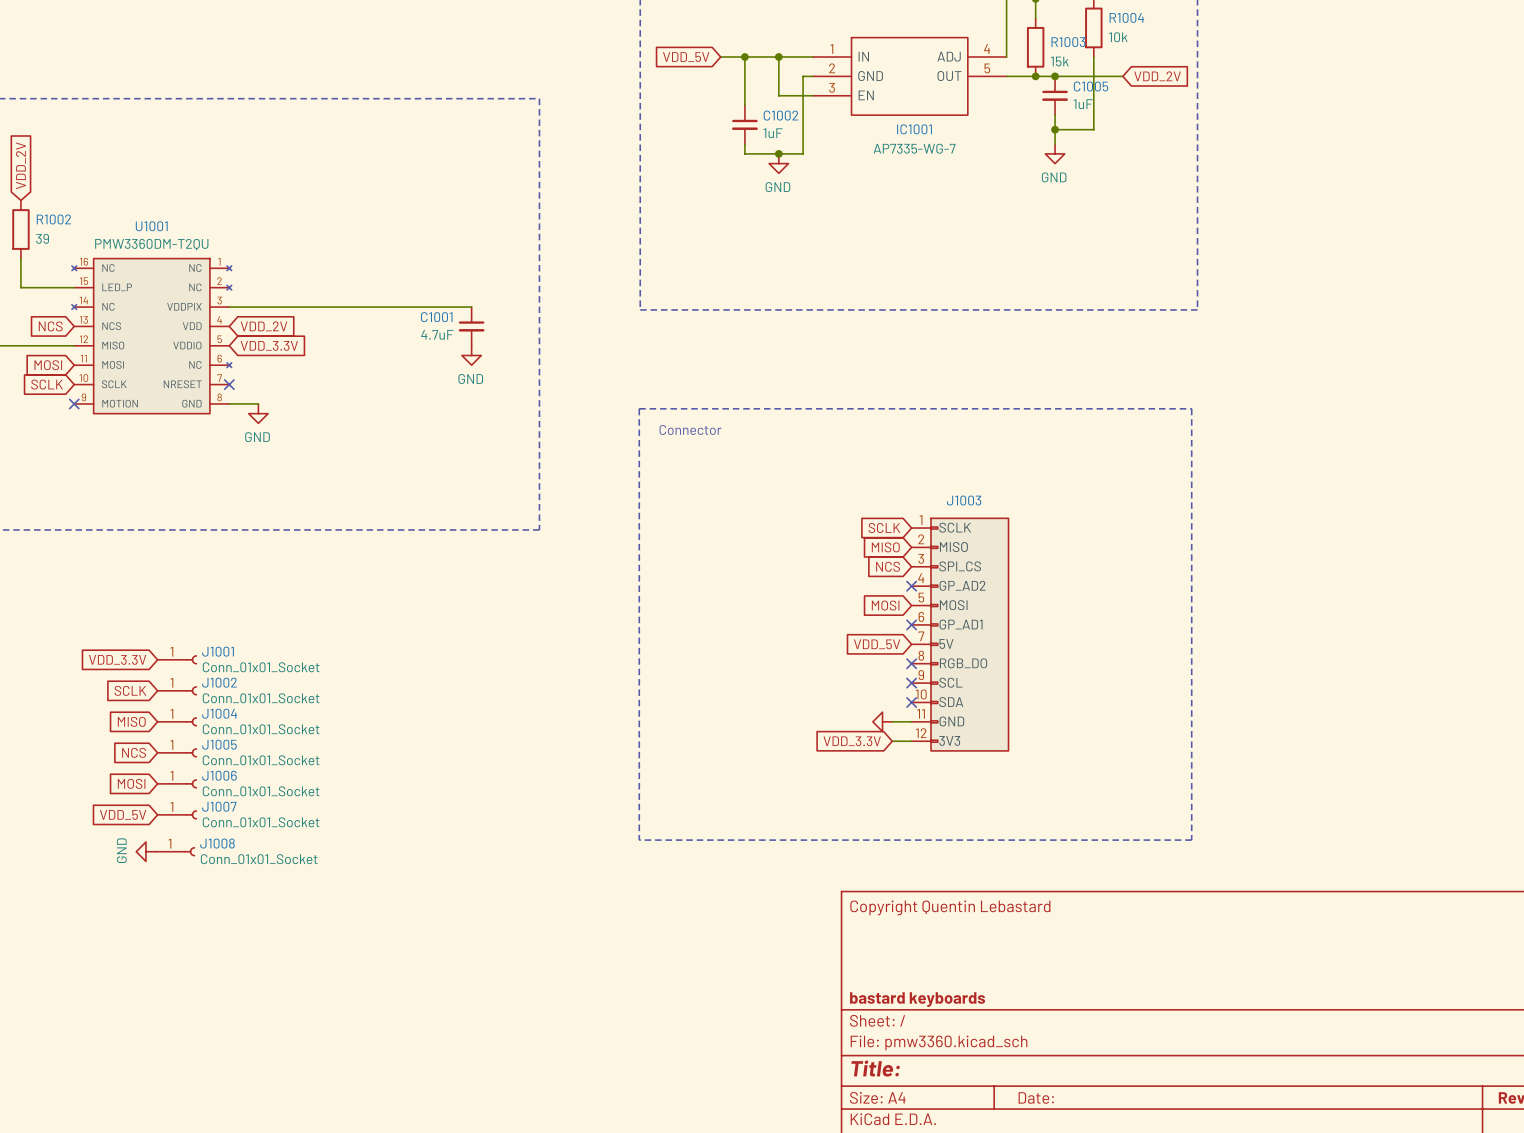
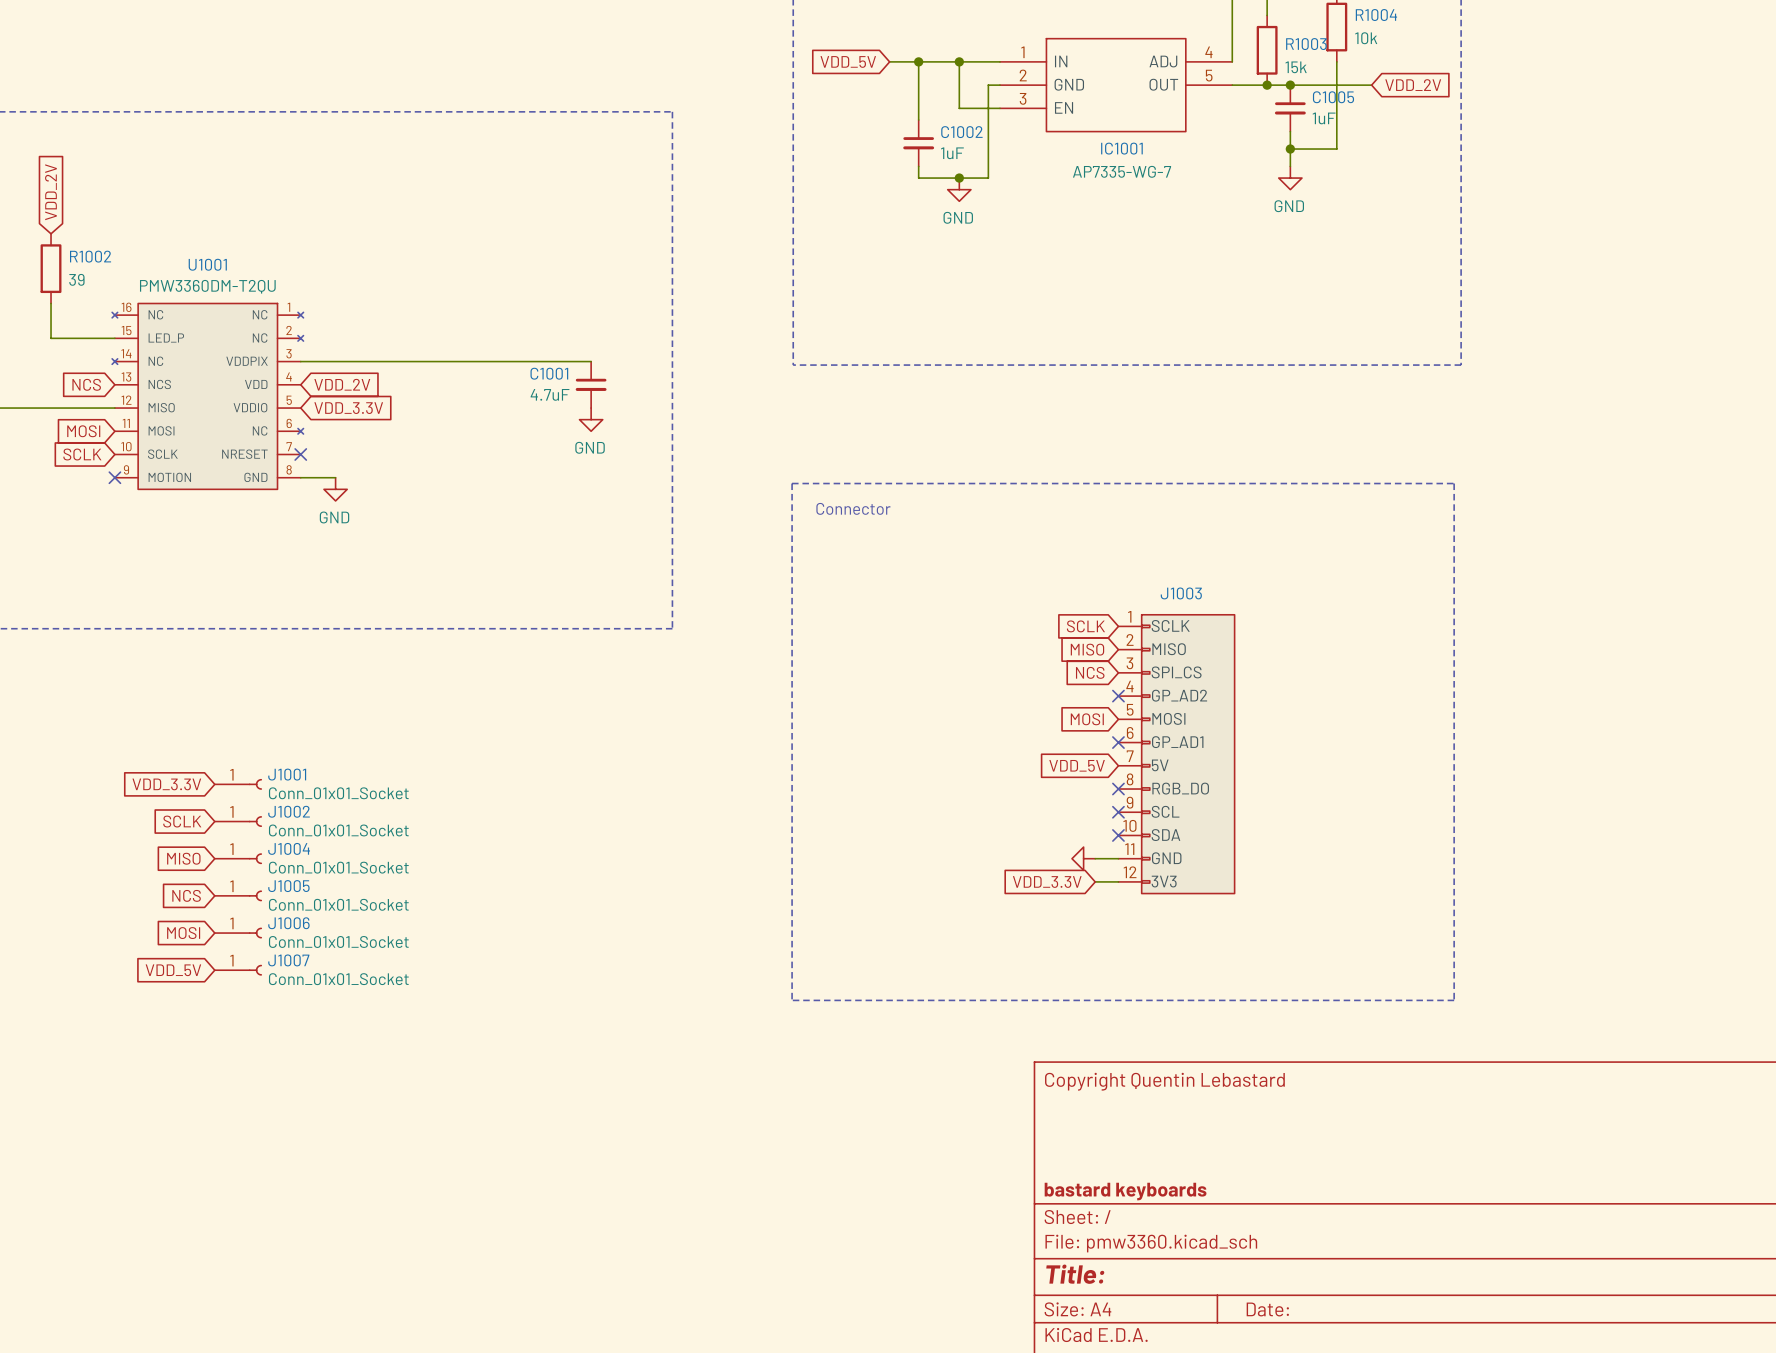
power symbol: GND (145, 851) -> none
J1008: Conn_01x01_Socket (175, 851) -> none

